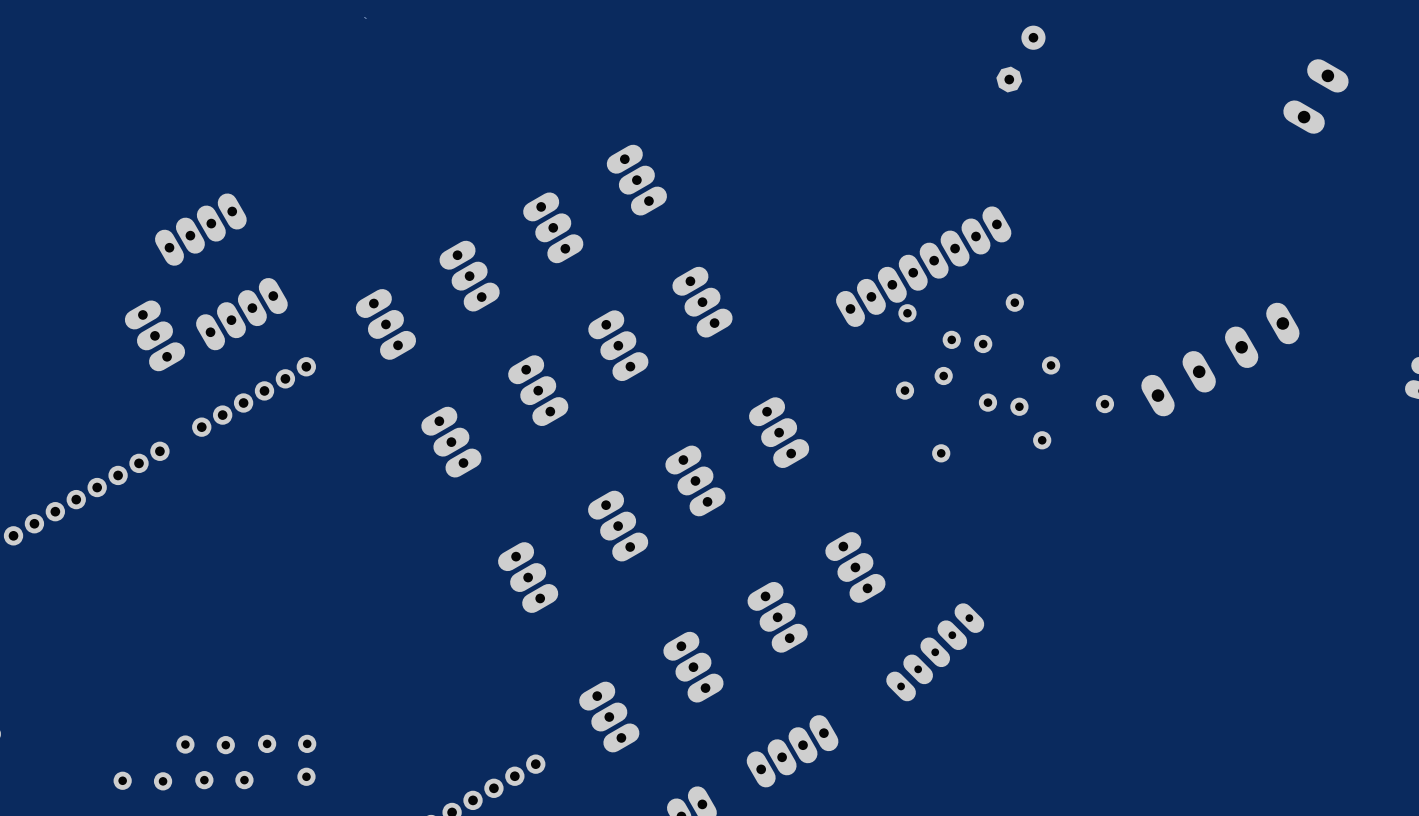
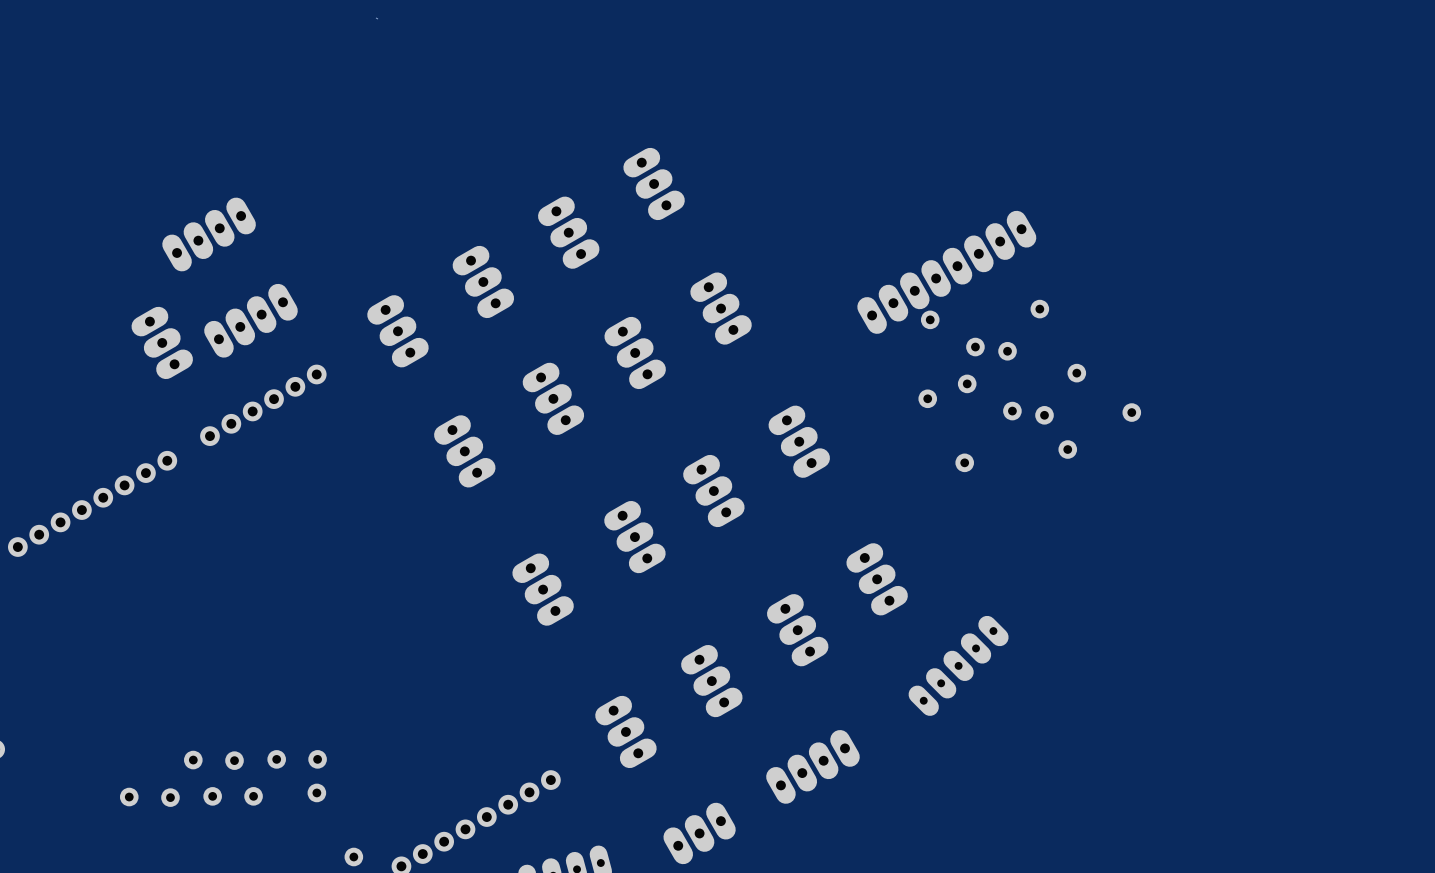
part: (1020, 59) -> none
part: (1315, 96) -> none
part: (1262, 335) -> none
part: (1178, 383) -> none

